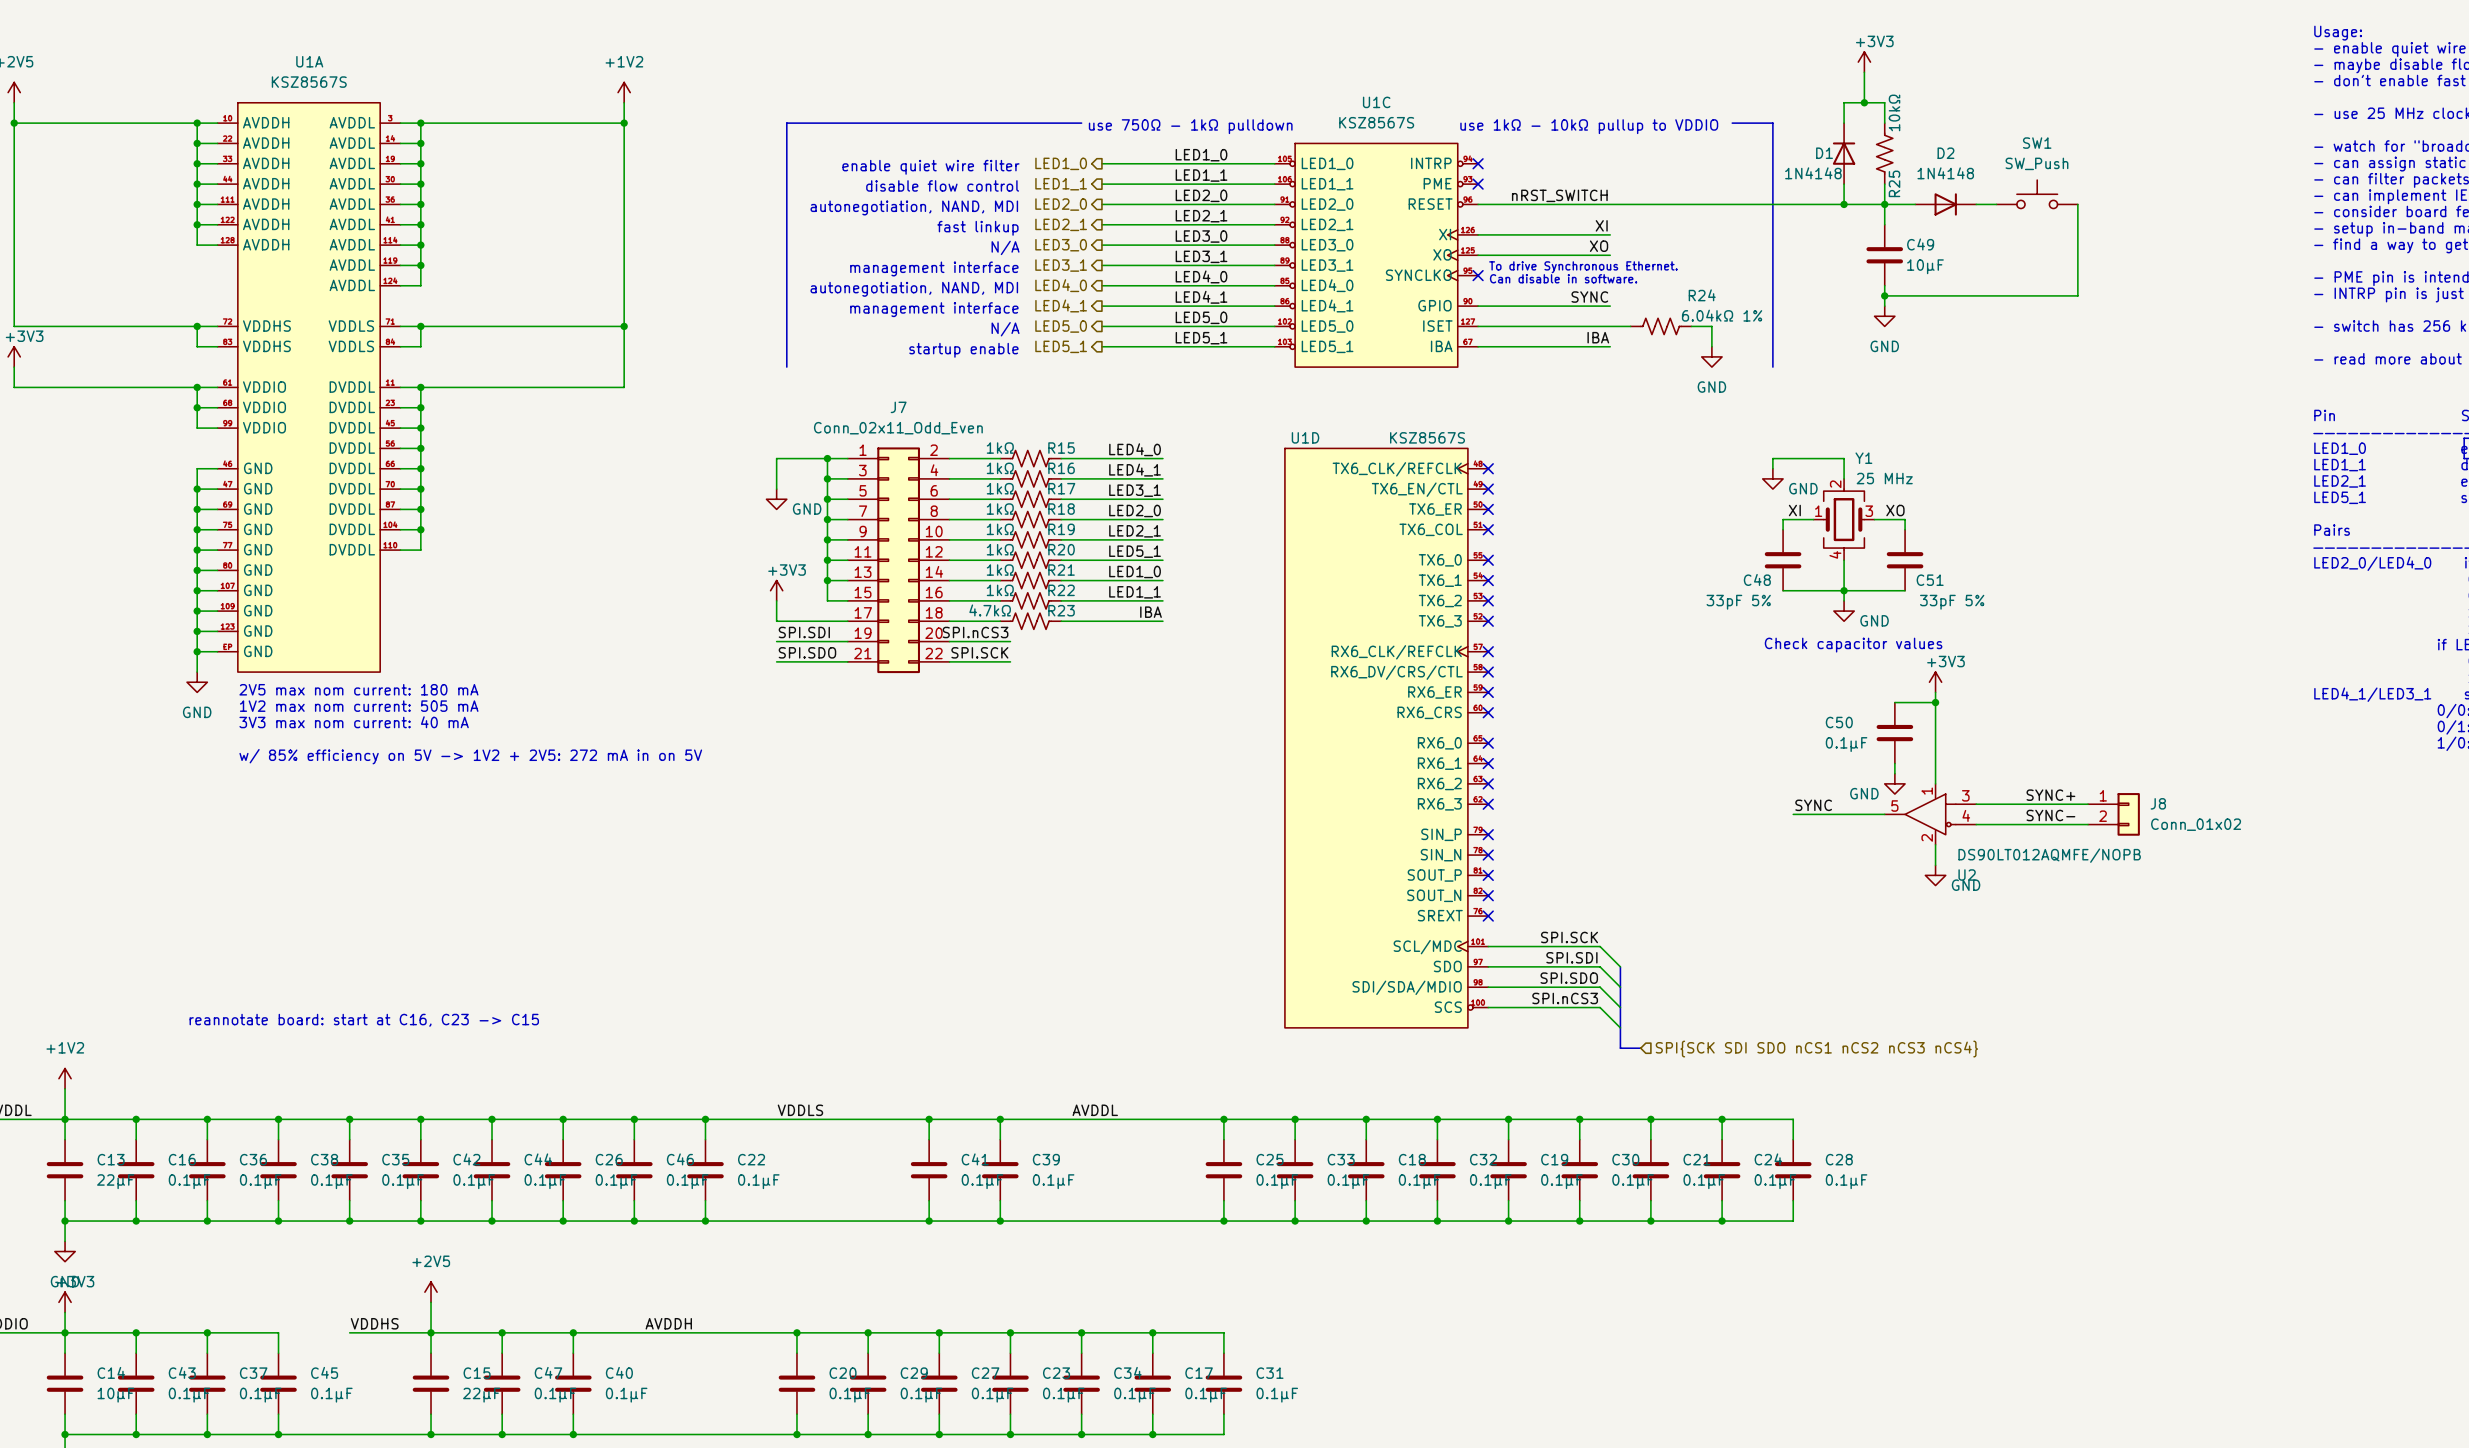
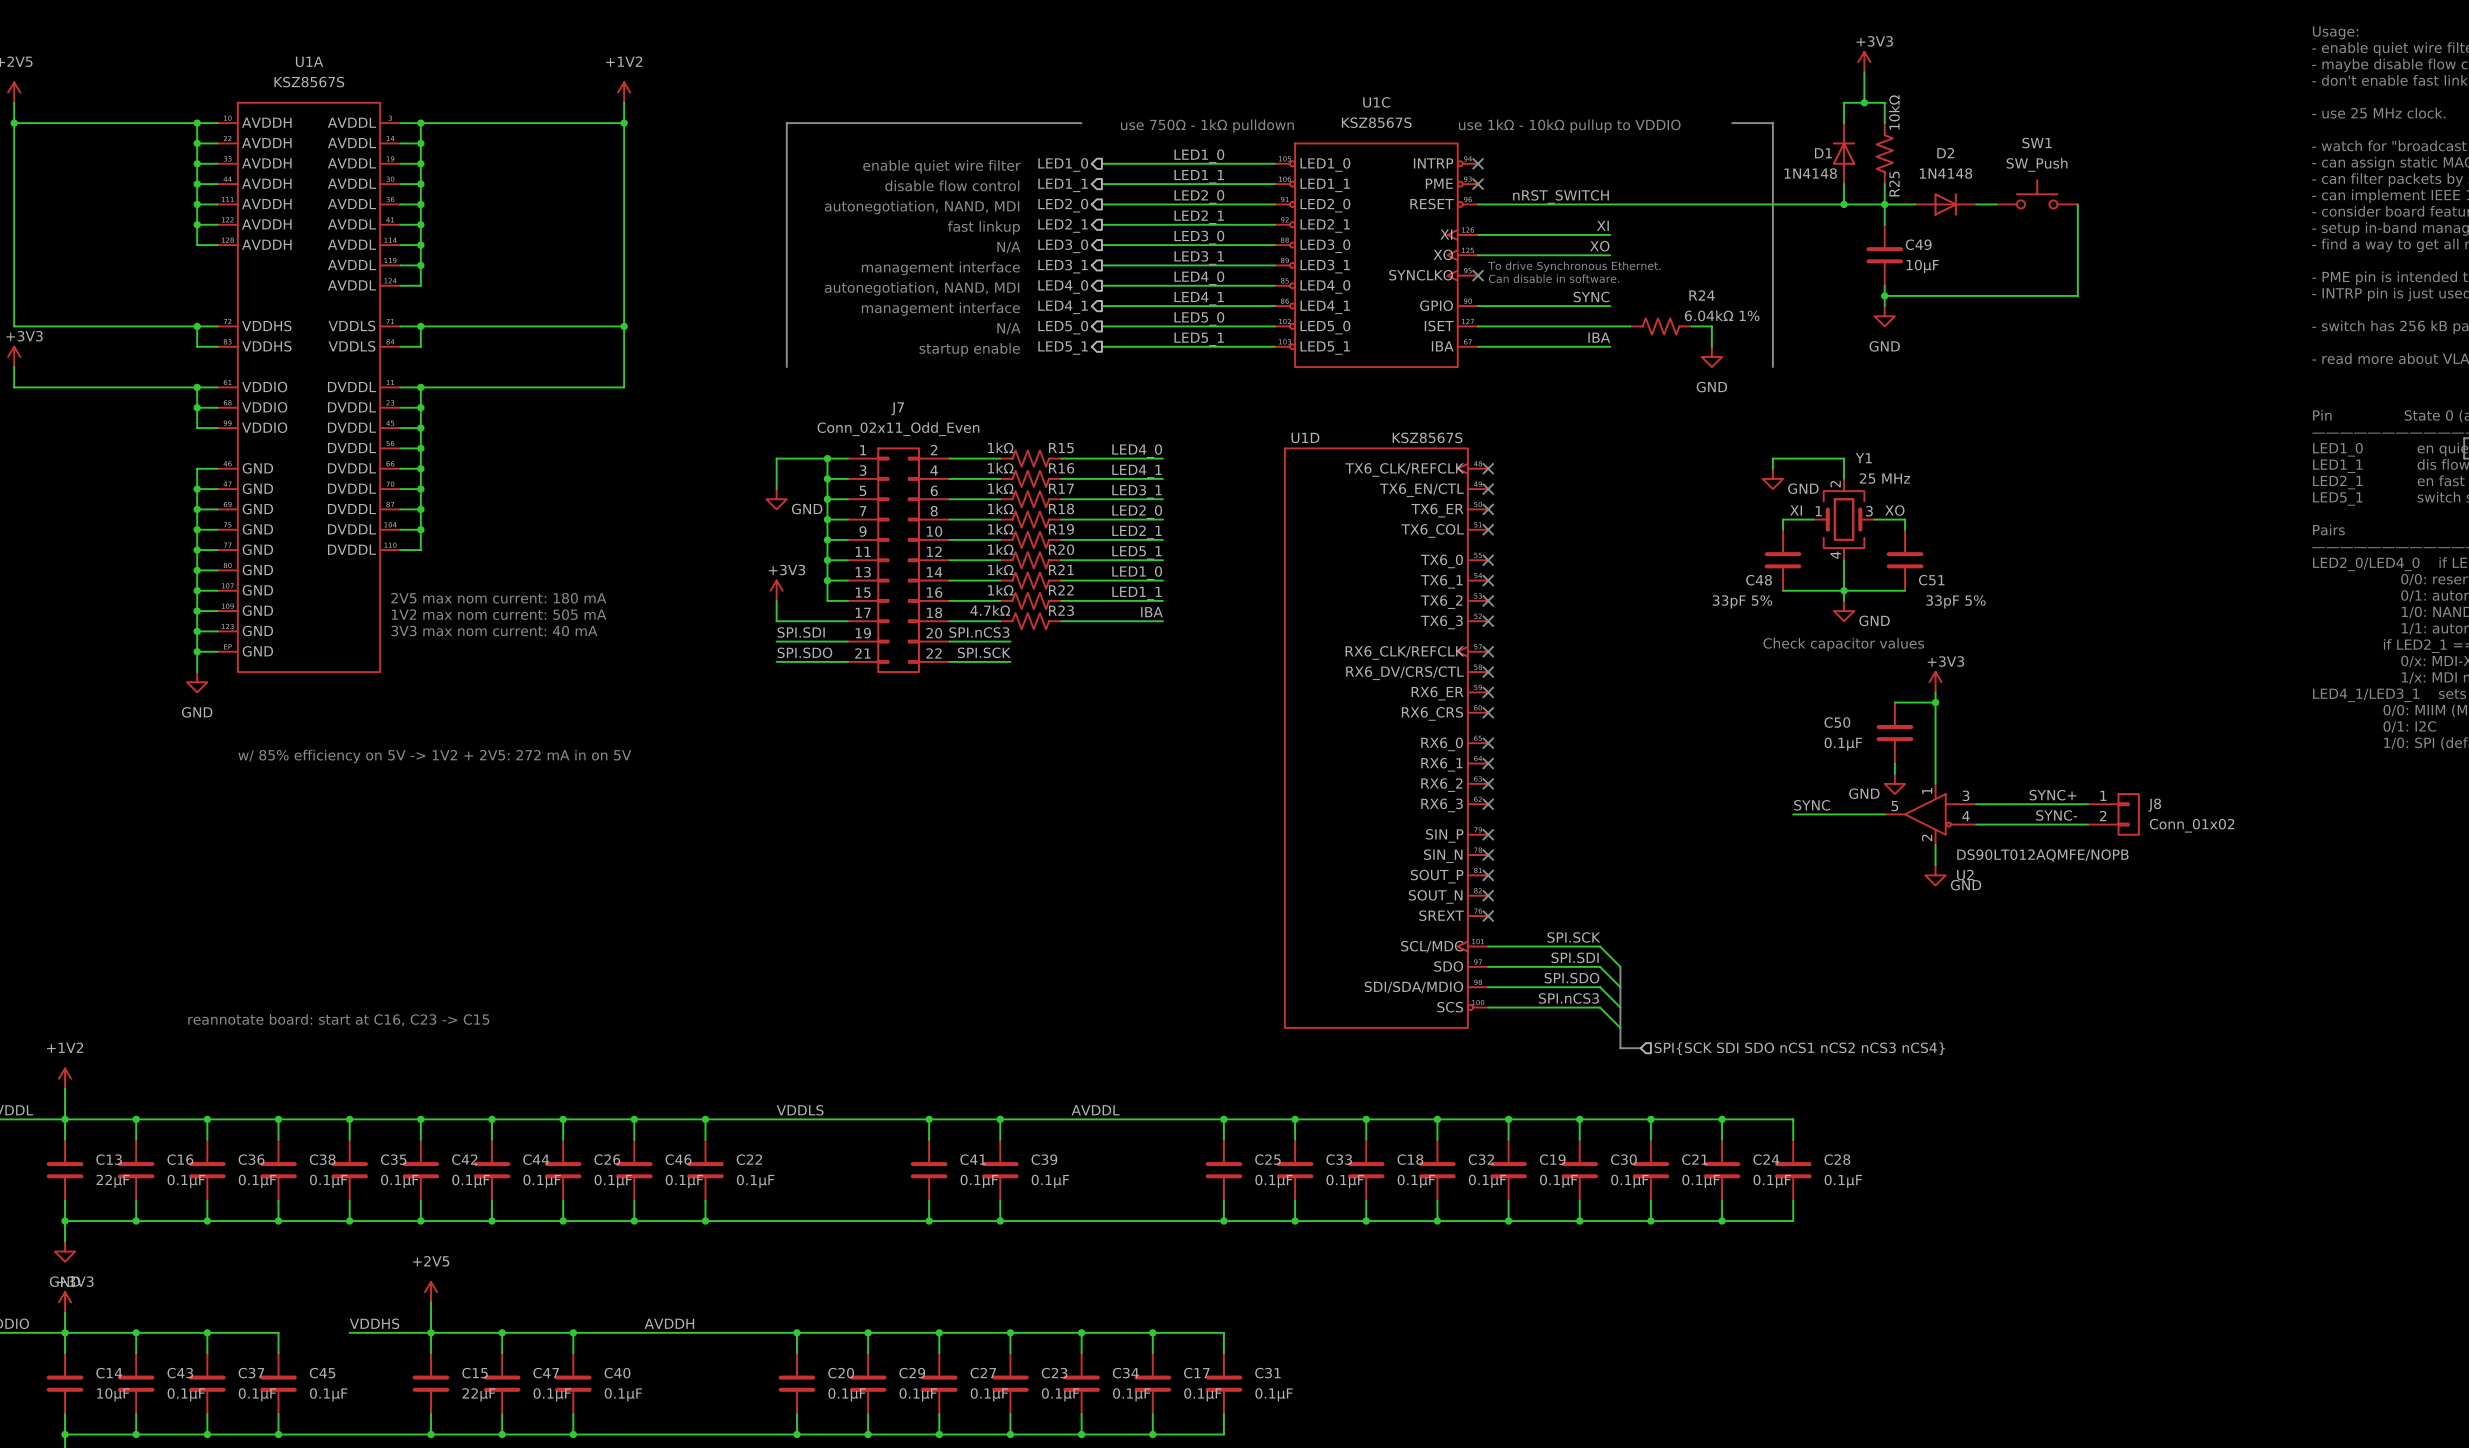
text position: 2V5 max nom current: 180 mA (358, 689) -> 2V5 max nom current: 180 mA (498, 598)
text position: 1V2 max nom current: 505 mA (359, 706) -> 1V2 max nom current: 505 mA (499, 614)
text position: 3V3 max nom current: 40 mA (354, 722) -> 3V3 max nom current: 40 mA (494, 631)

